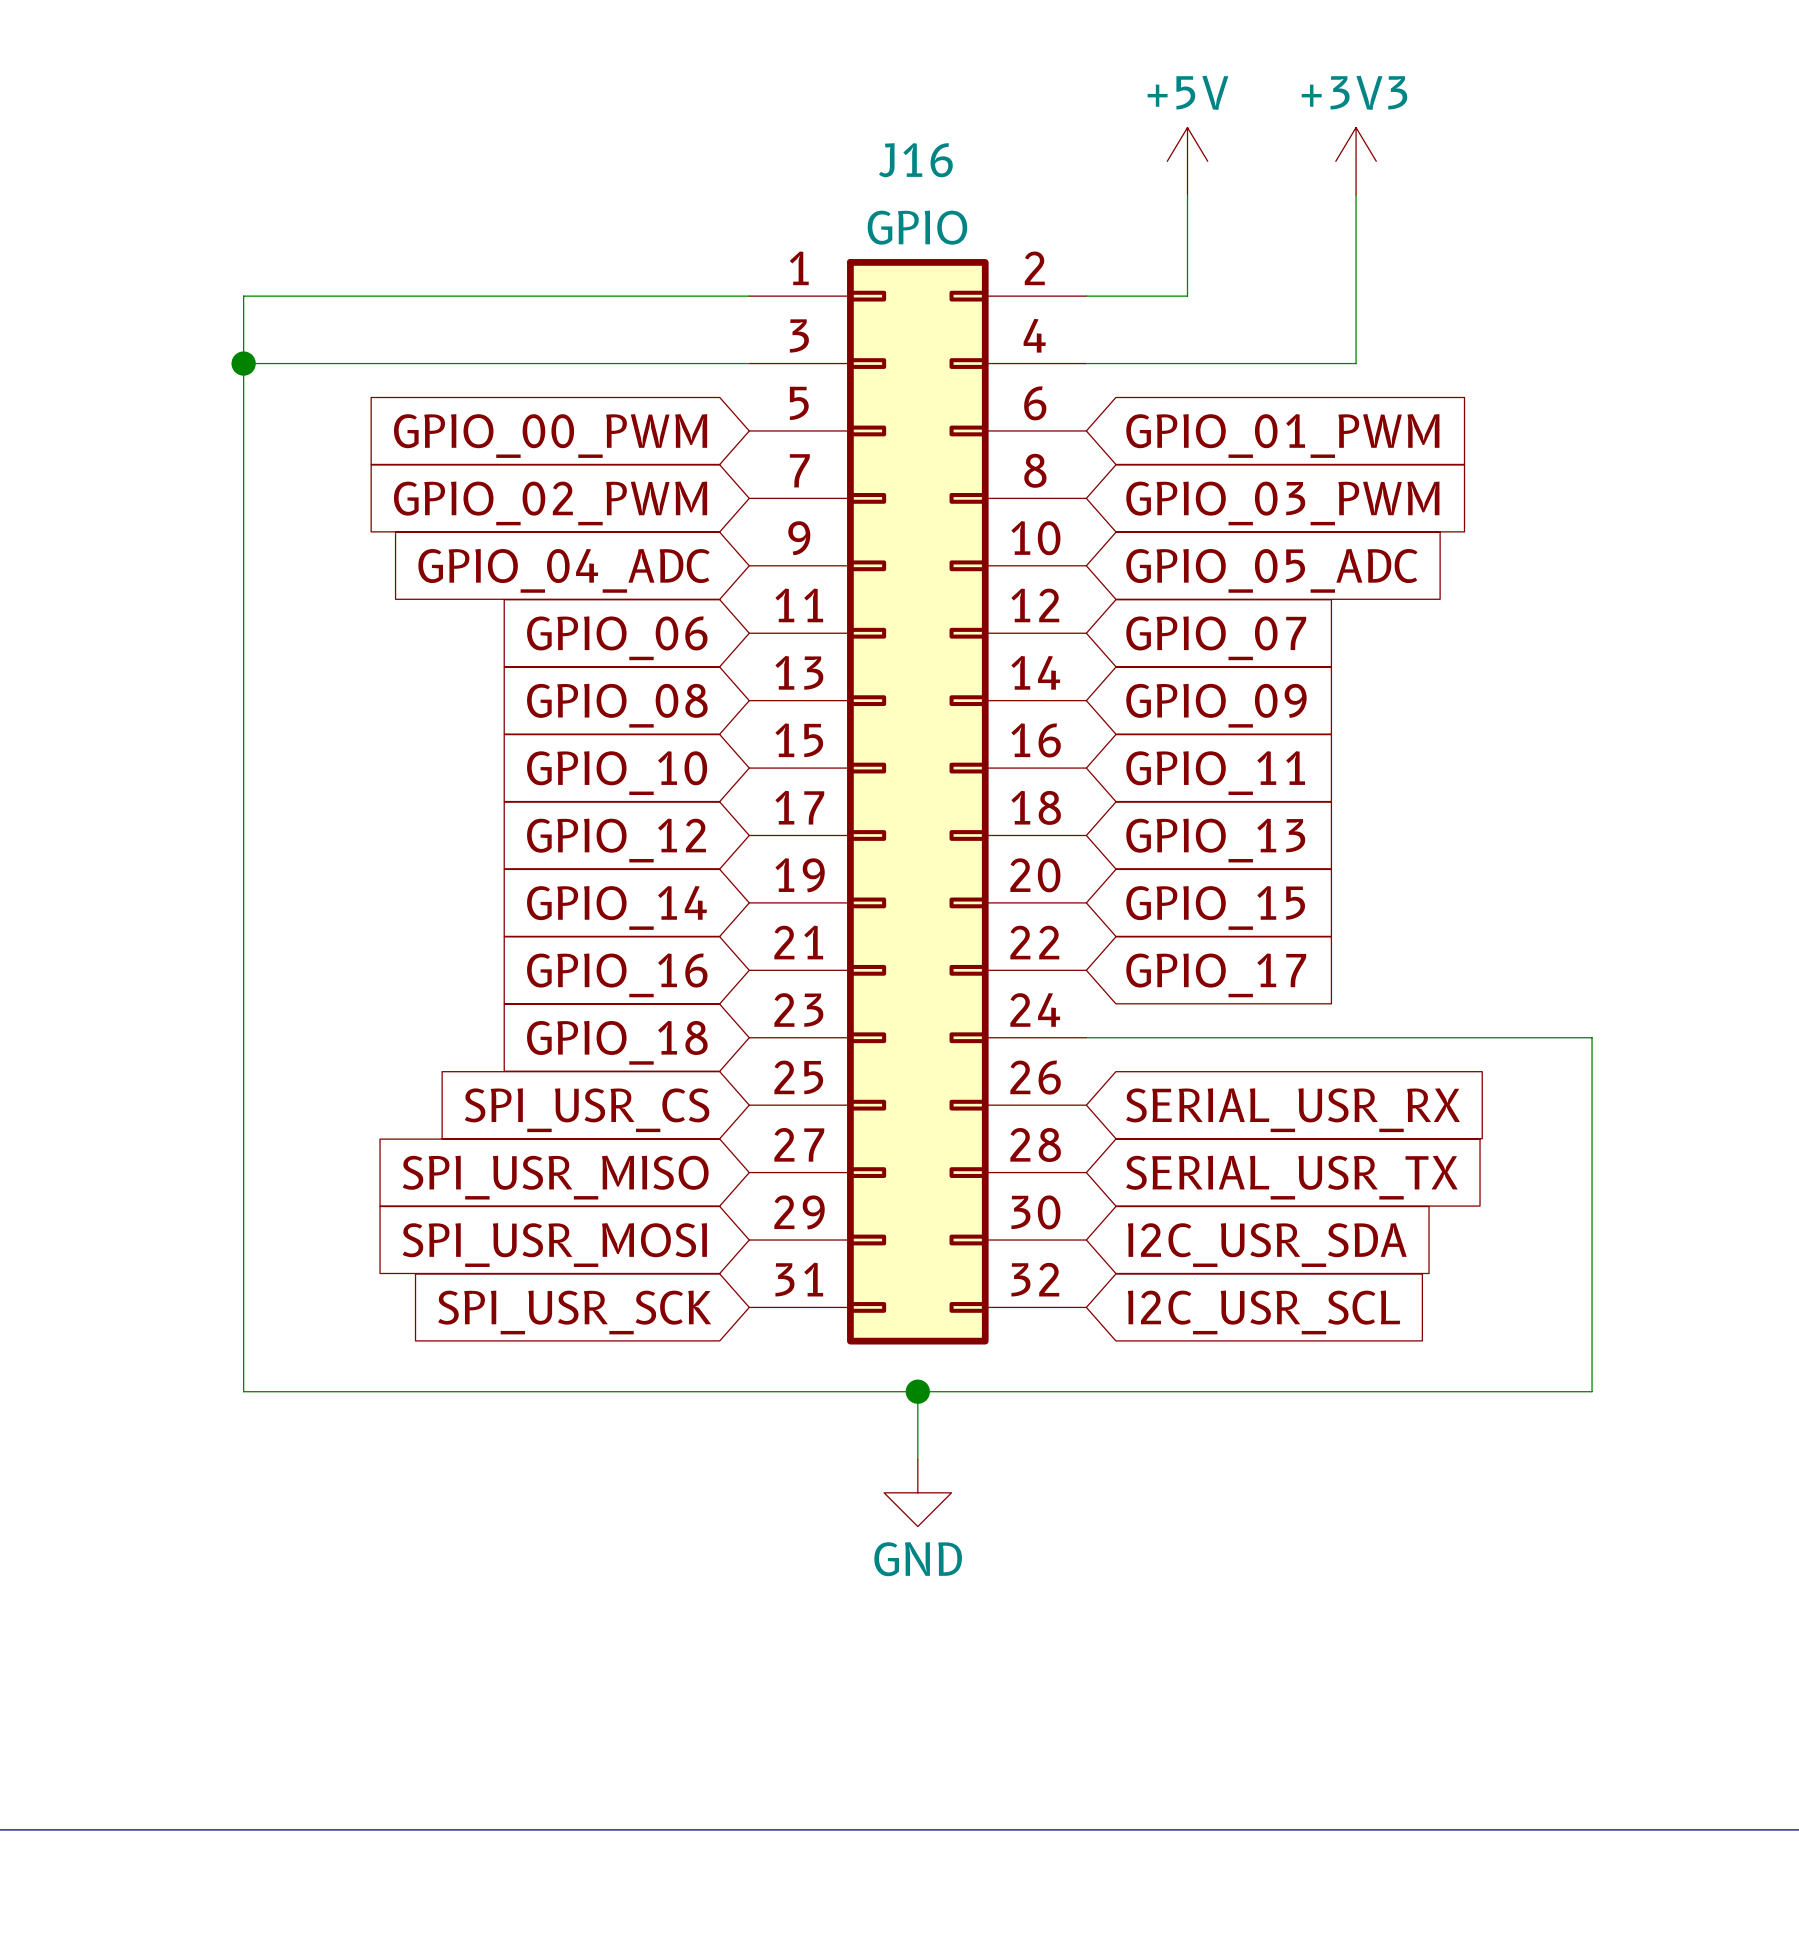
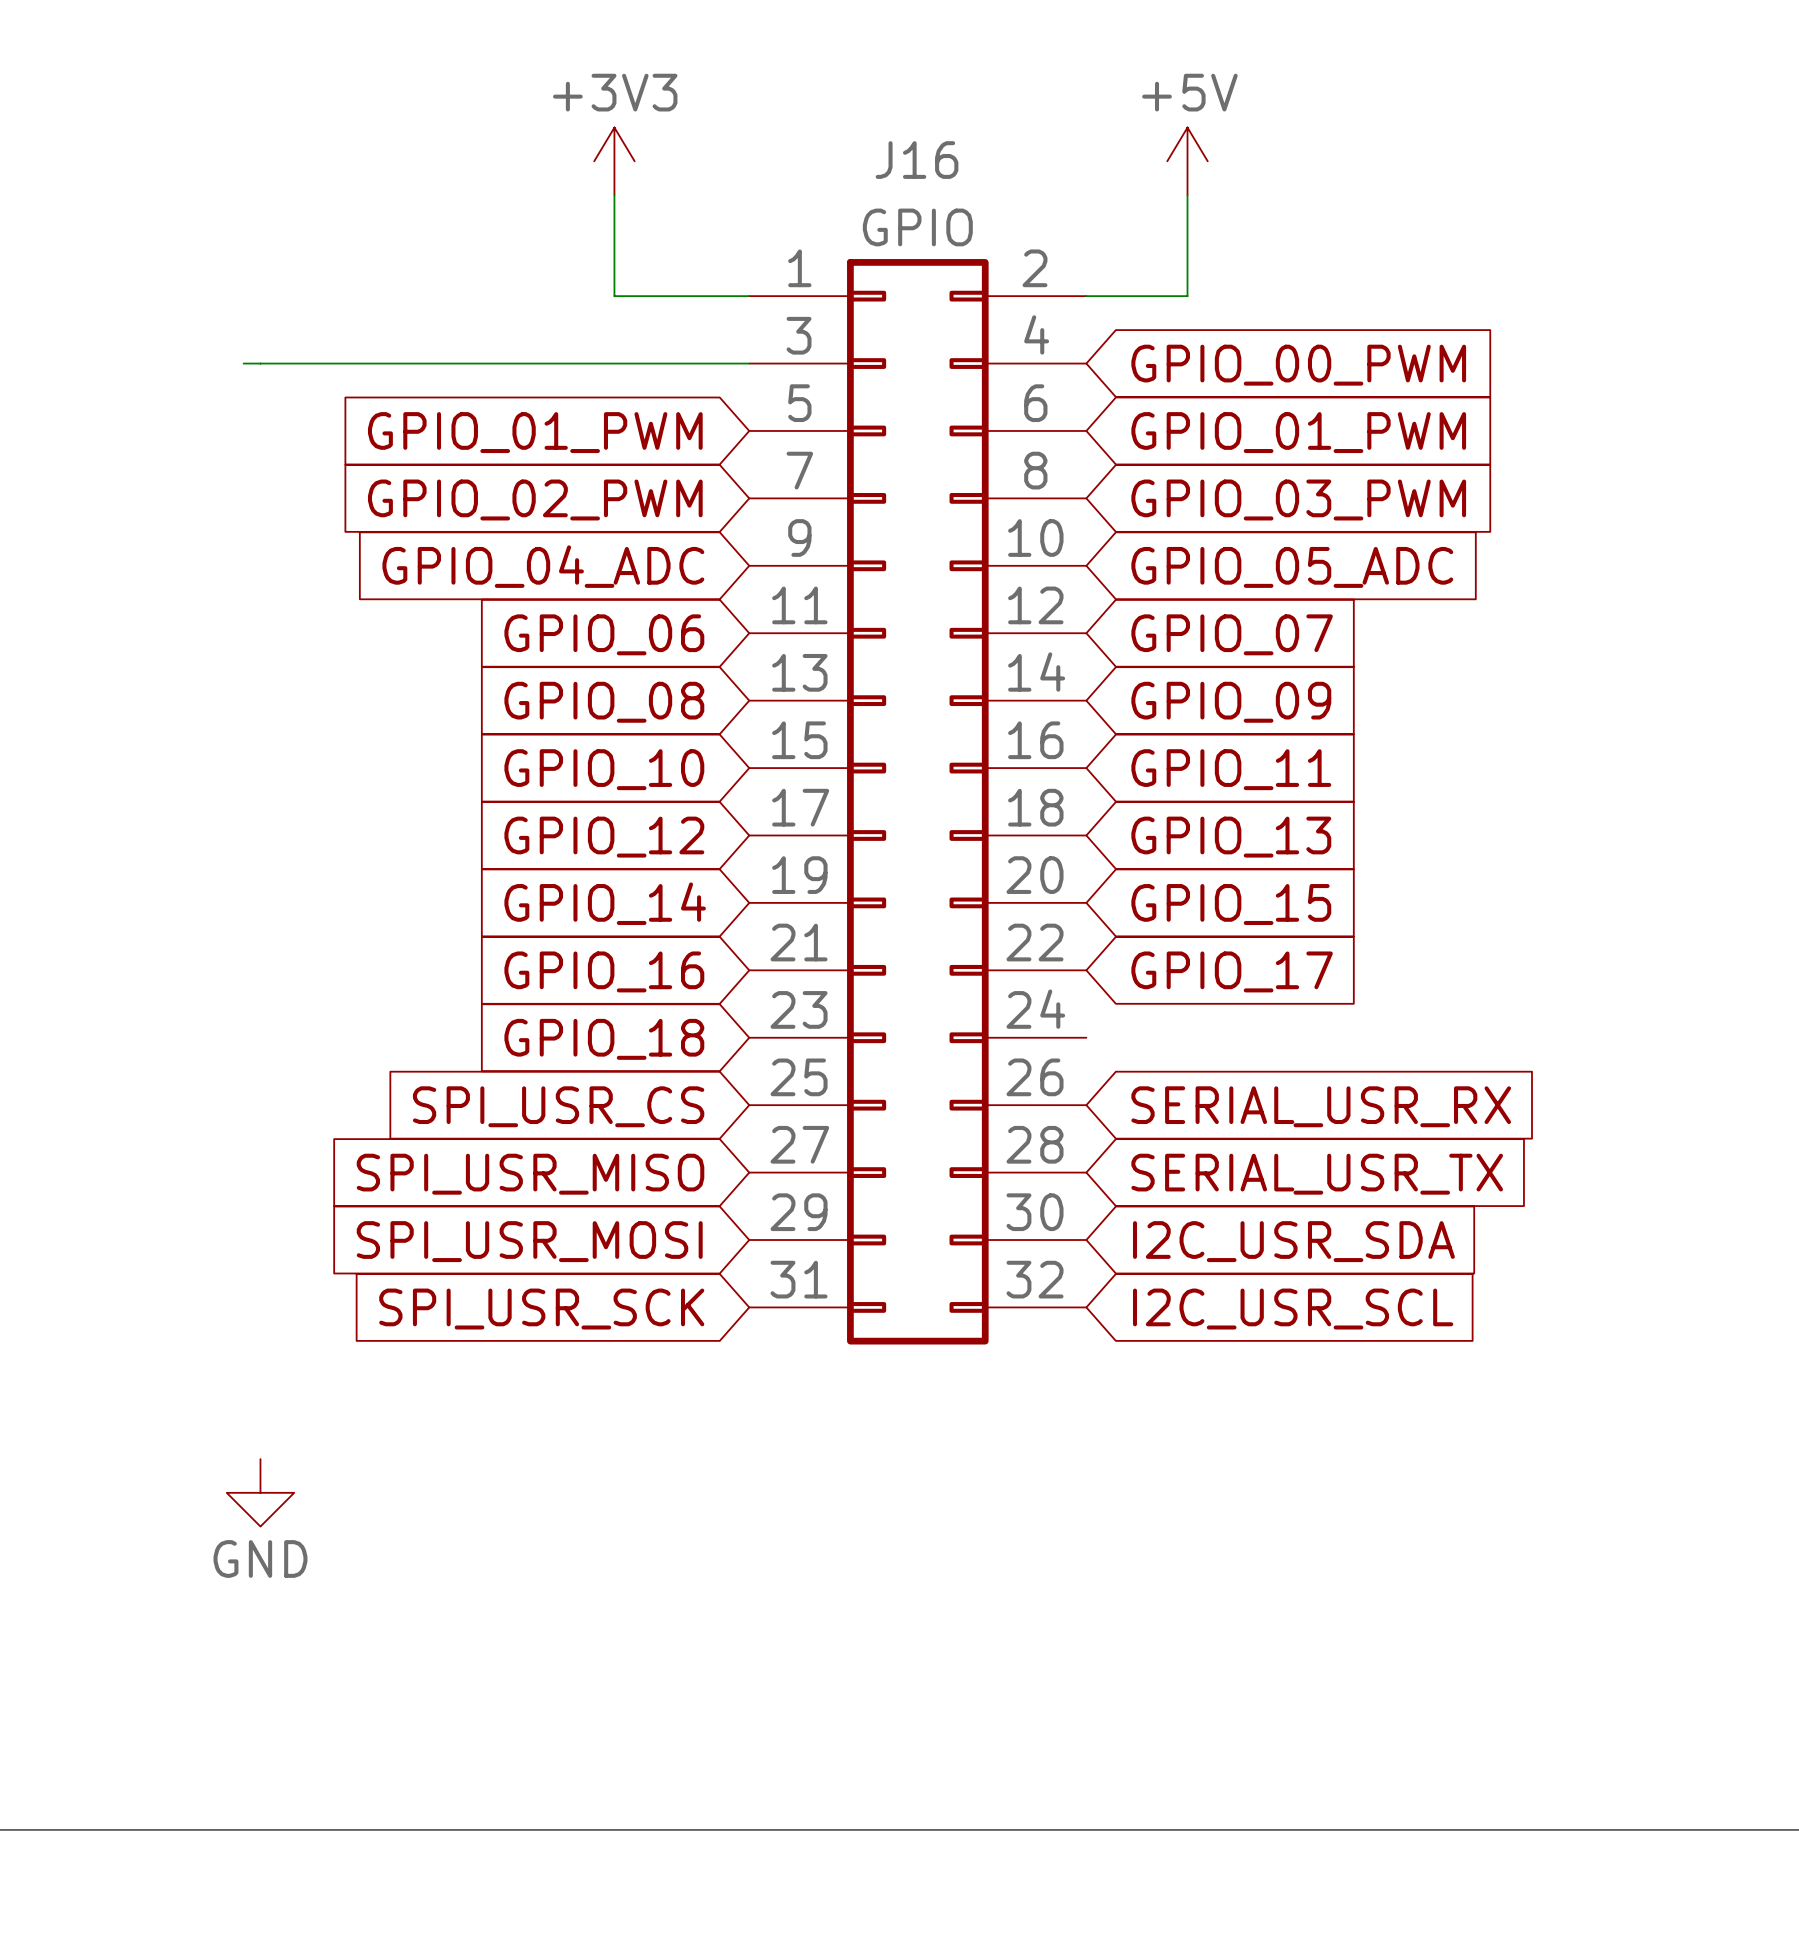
power symbol: none -> +3V3 (614, 161)
power symbol: +3V3 (1356, 161) -> none
wire: (1356, 195) (1356, 363) (1086, 363) -> none
wire: (614, 296) (243, 296) (243, 1391) (1592, 1391) (1592, 1037) (1086, 1037) -> (614, 296) (614, 195)
junction: (243, 363) -> none
global label: none -> GPIO_00_PWM (1298, 365)
global label: GPIO_00_PWM (550, 436) -> GPIO_01_PWM (535, 432)
wire: (917, 1391) (917, 1459) -> none
junction: (917, 1391) -> none
power symbol position: GND (917, 1492) -> GND (260, 1492)

